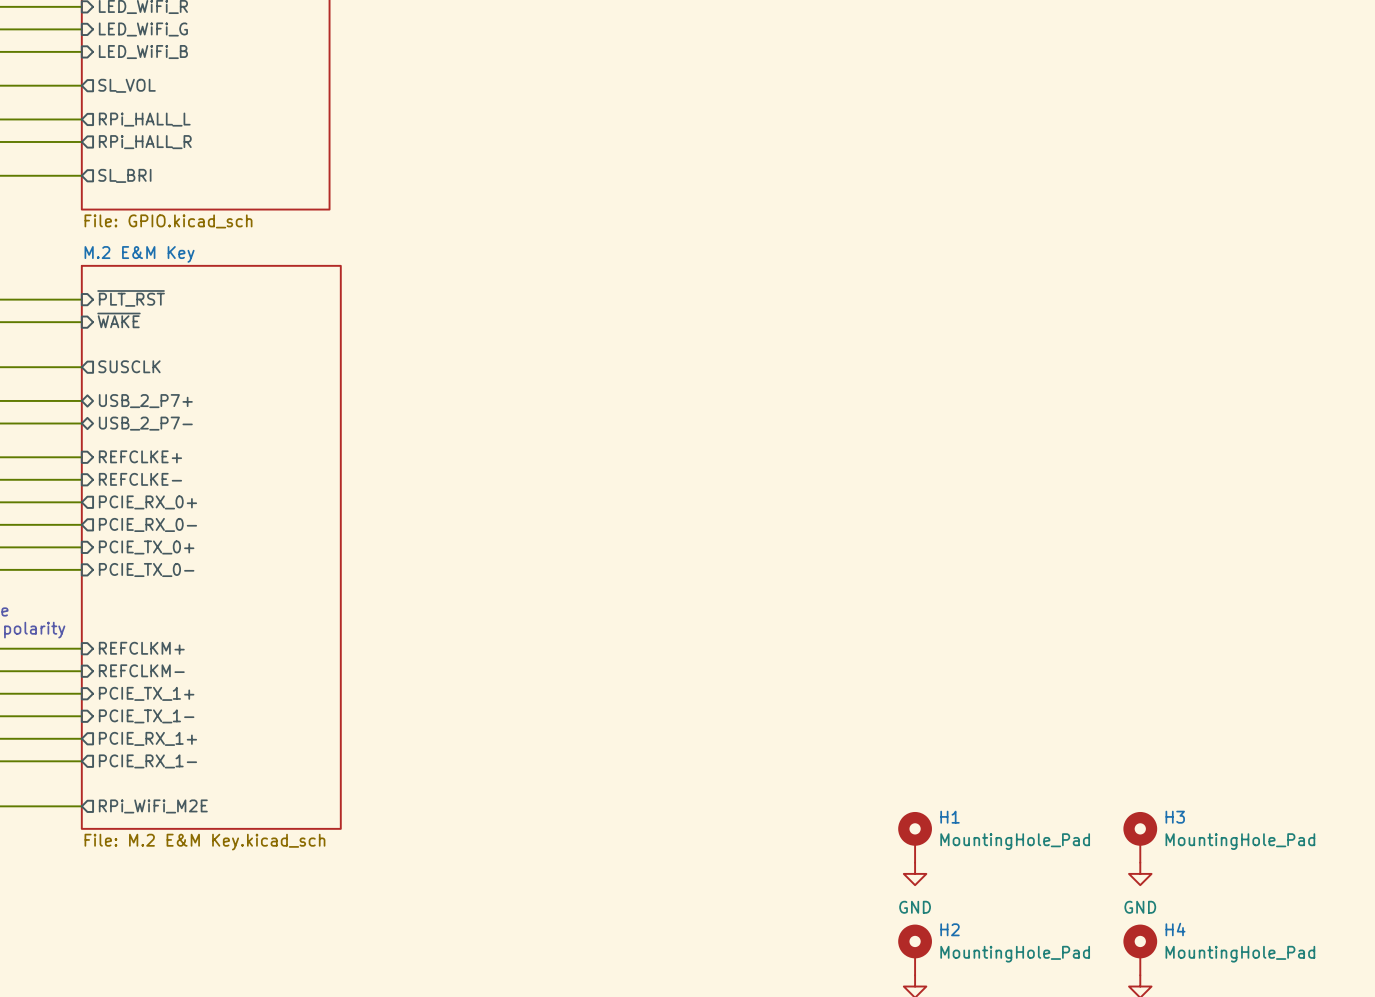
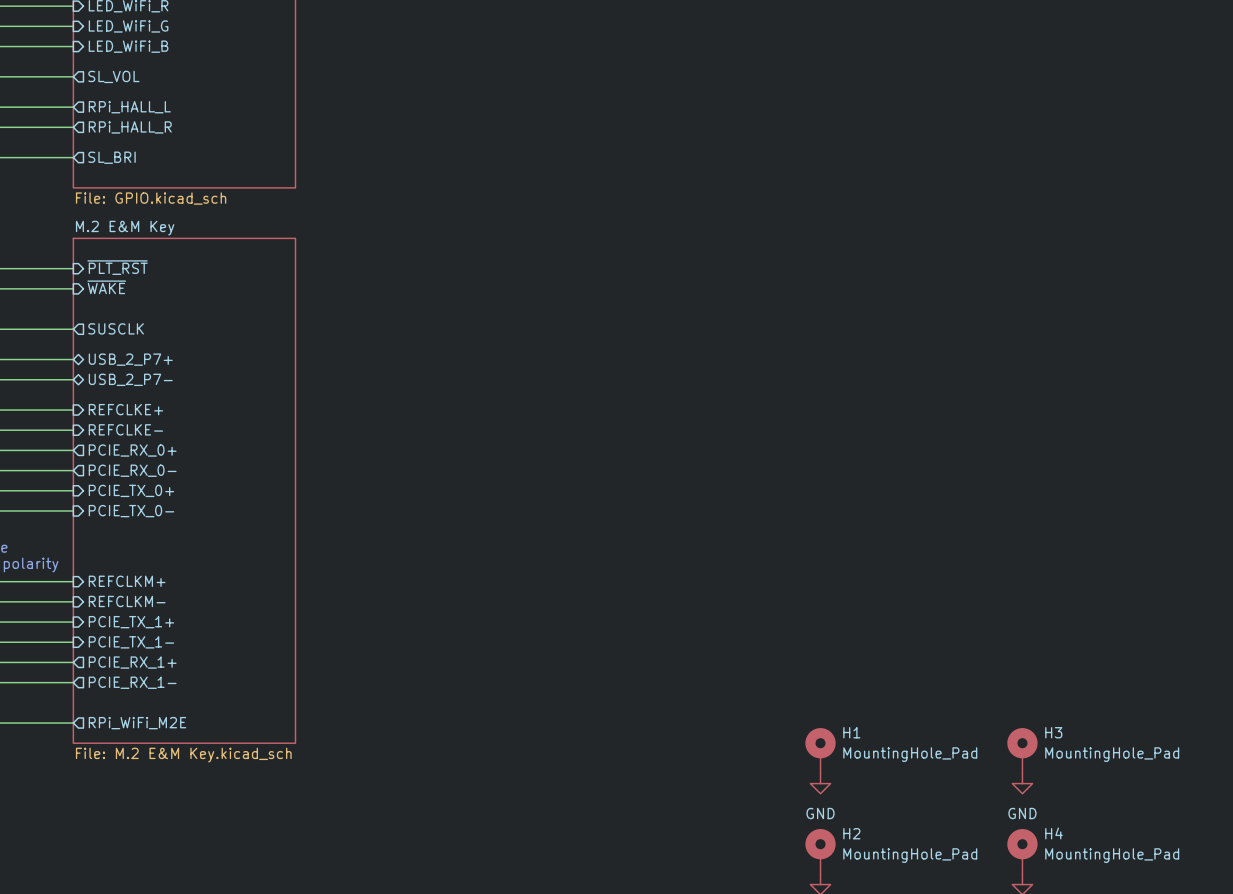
sheet M.2 E&M Key shape: [81, 265, 342, 830] -> [72, 237, 297, 744]

